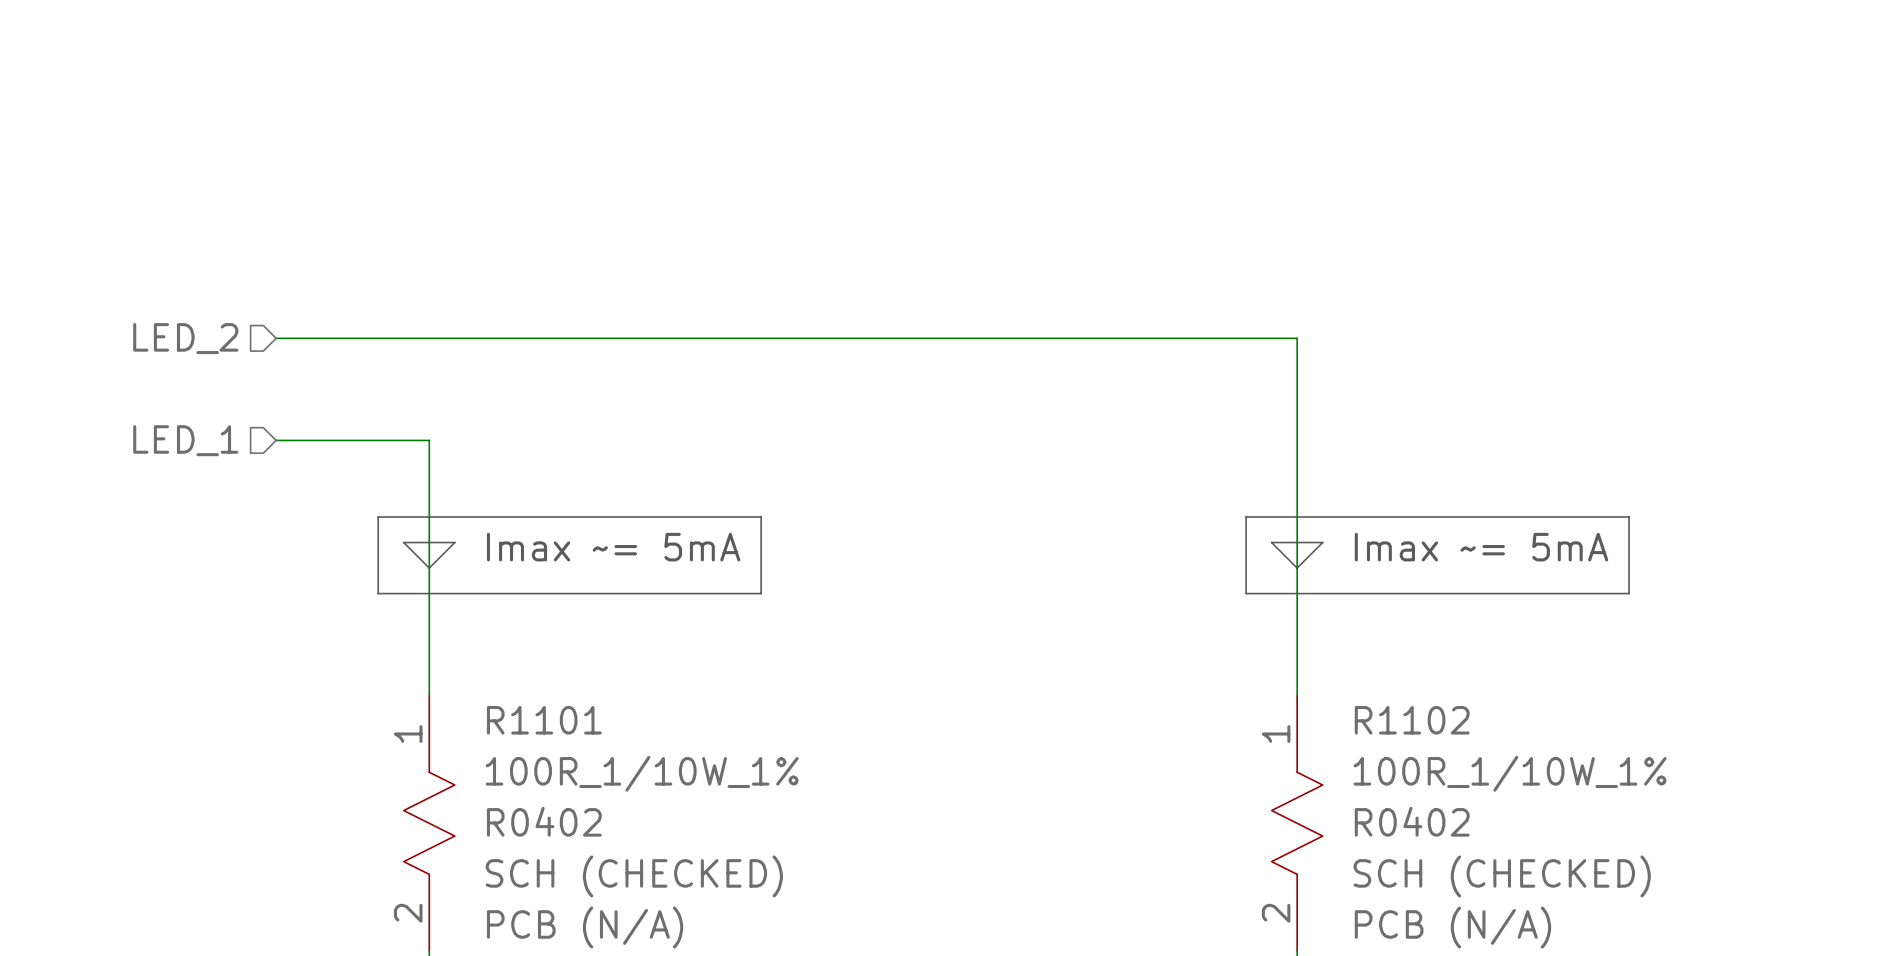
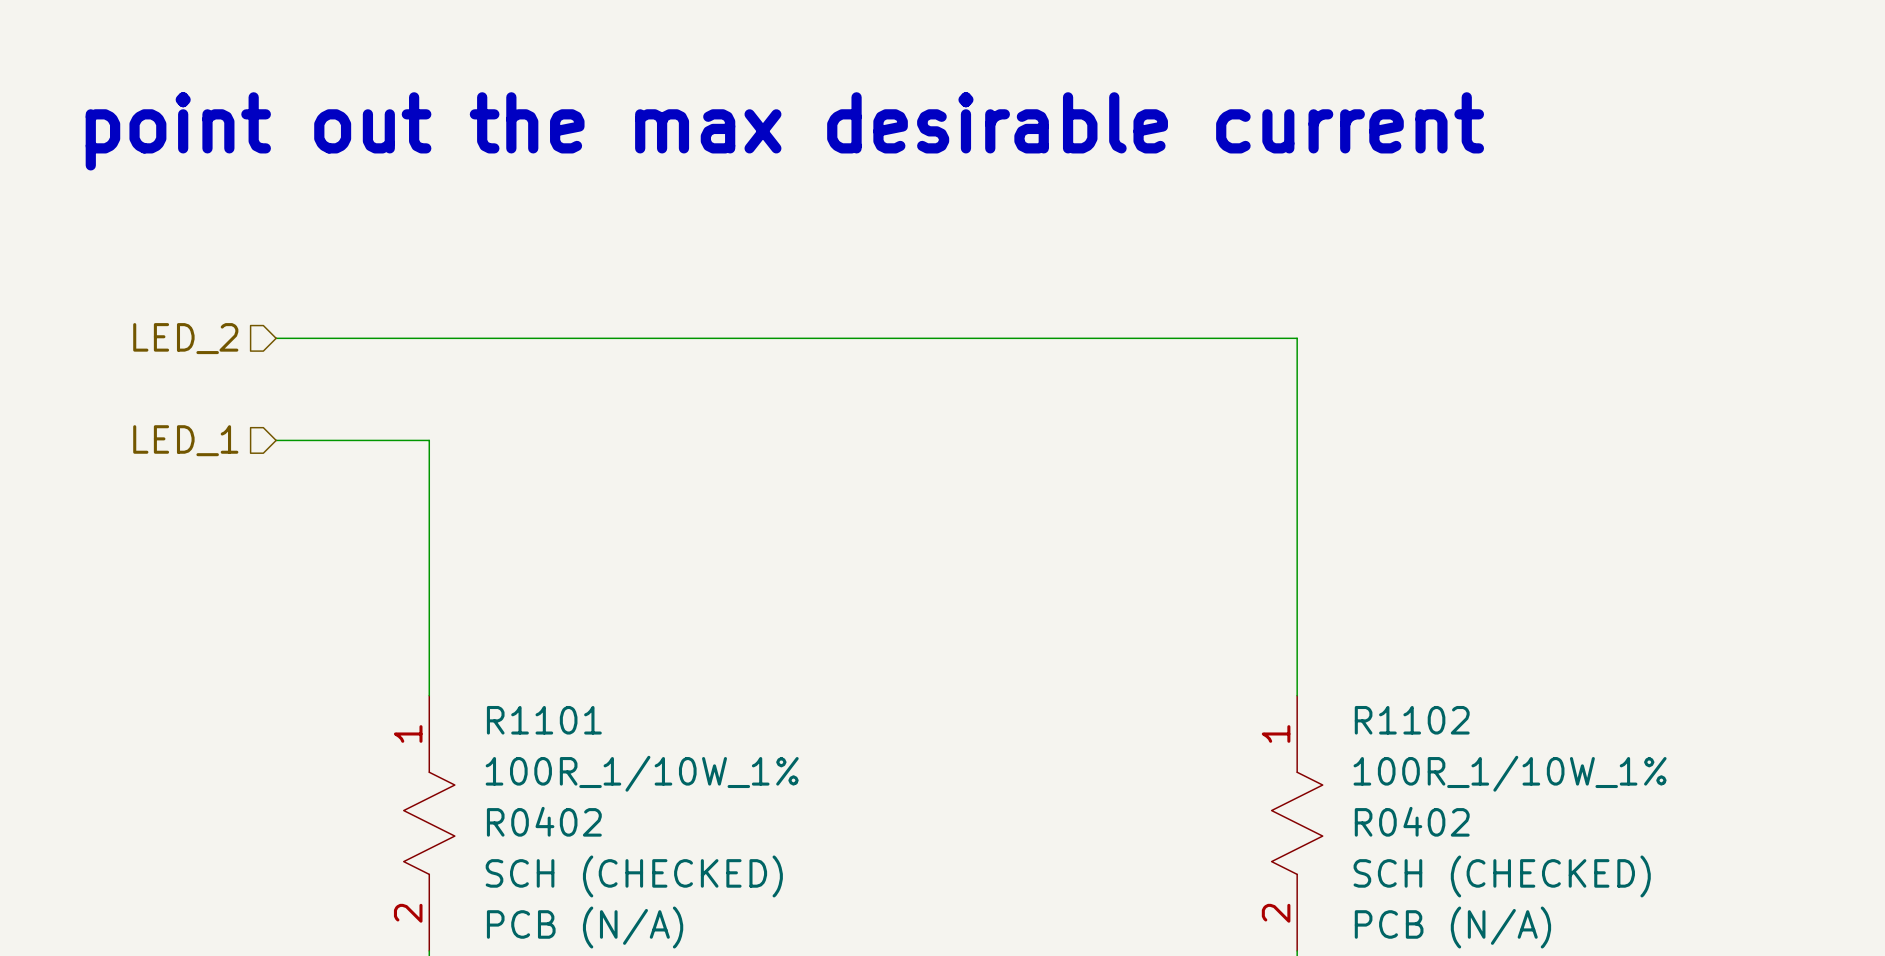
text: none -> point out the max desirable current (784, 131)
line: (378, 517) (761, 517) (761, 593) (378, 593) (378, 517) -> none
line: (1246, 517) (1629, 517) (1629, 593) (1246, 593) (1246, 517) -> none
line: (403, 542) (454, 542) (429, 568) (403, 542) -> none
line: (1271, 542) (1322, 542) (1297, 568) (1271, 542) -> none
text: Imax ~= 5mA (613, 547) -> none
text: Imax ~= 5mA (1481, 547) -> none

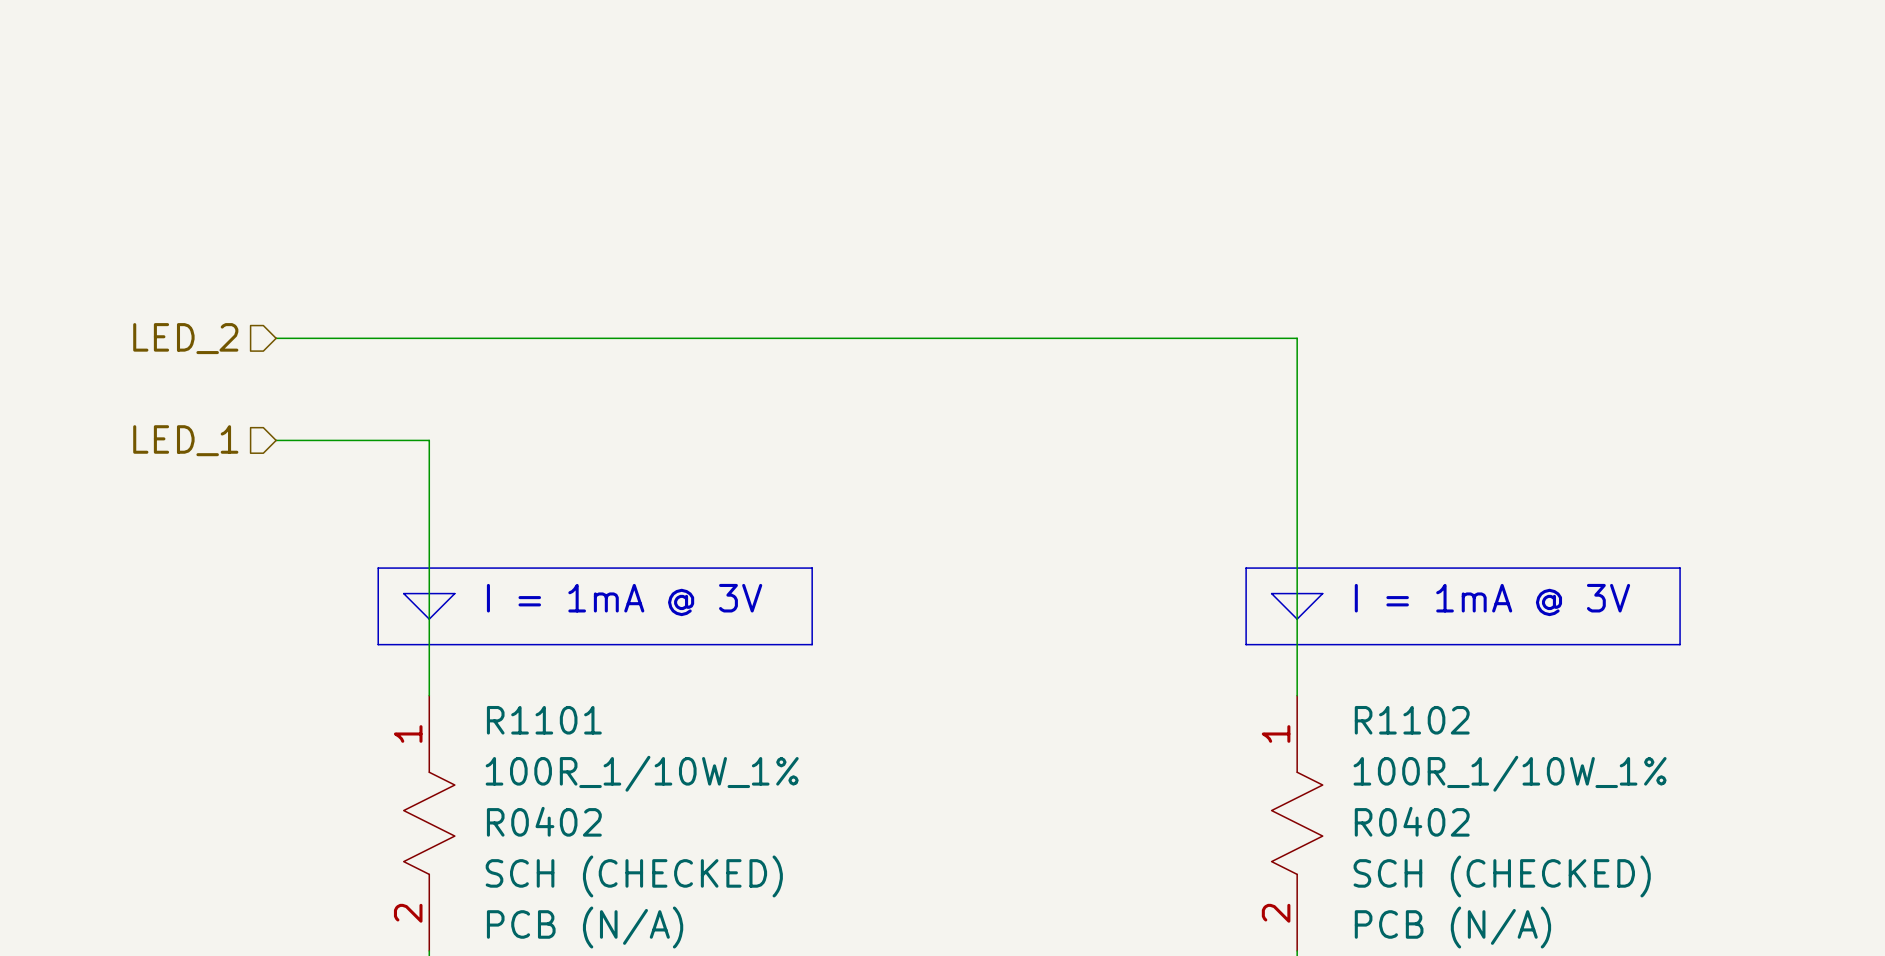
text: point out the max desirable current (784, 131) -> none
line: none -> (378, 568) (812, 568) (812, 644) (378, 644) (378, 568)
line: none -> (1246, 568) (1680, 568) (1680, 644) (1246, 644) (1246, 568)
line: none -> (403, 593) (454, 593) (429, 619) (403, 593)
line: none -> (1271, 593) (1322, 593) (1297, 619) (1271, 593)
text: none -> I = 1mA @ 3V (624, 600)
text: none -> I = 1mA @ 3V (1492, 600)

